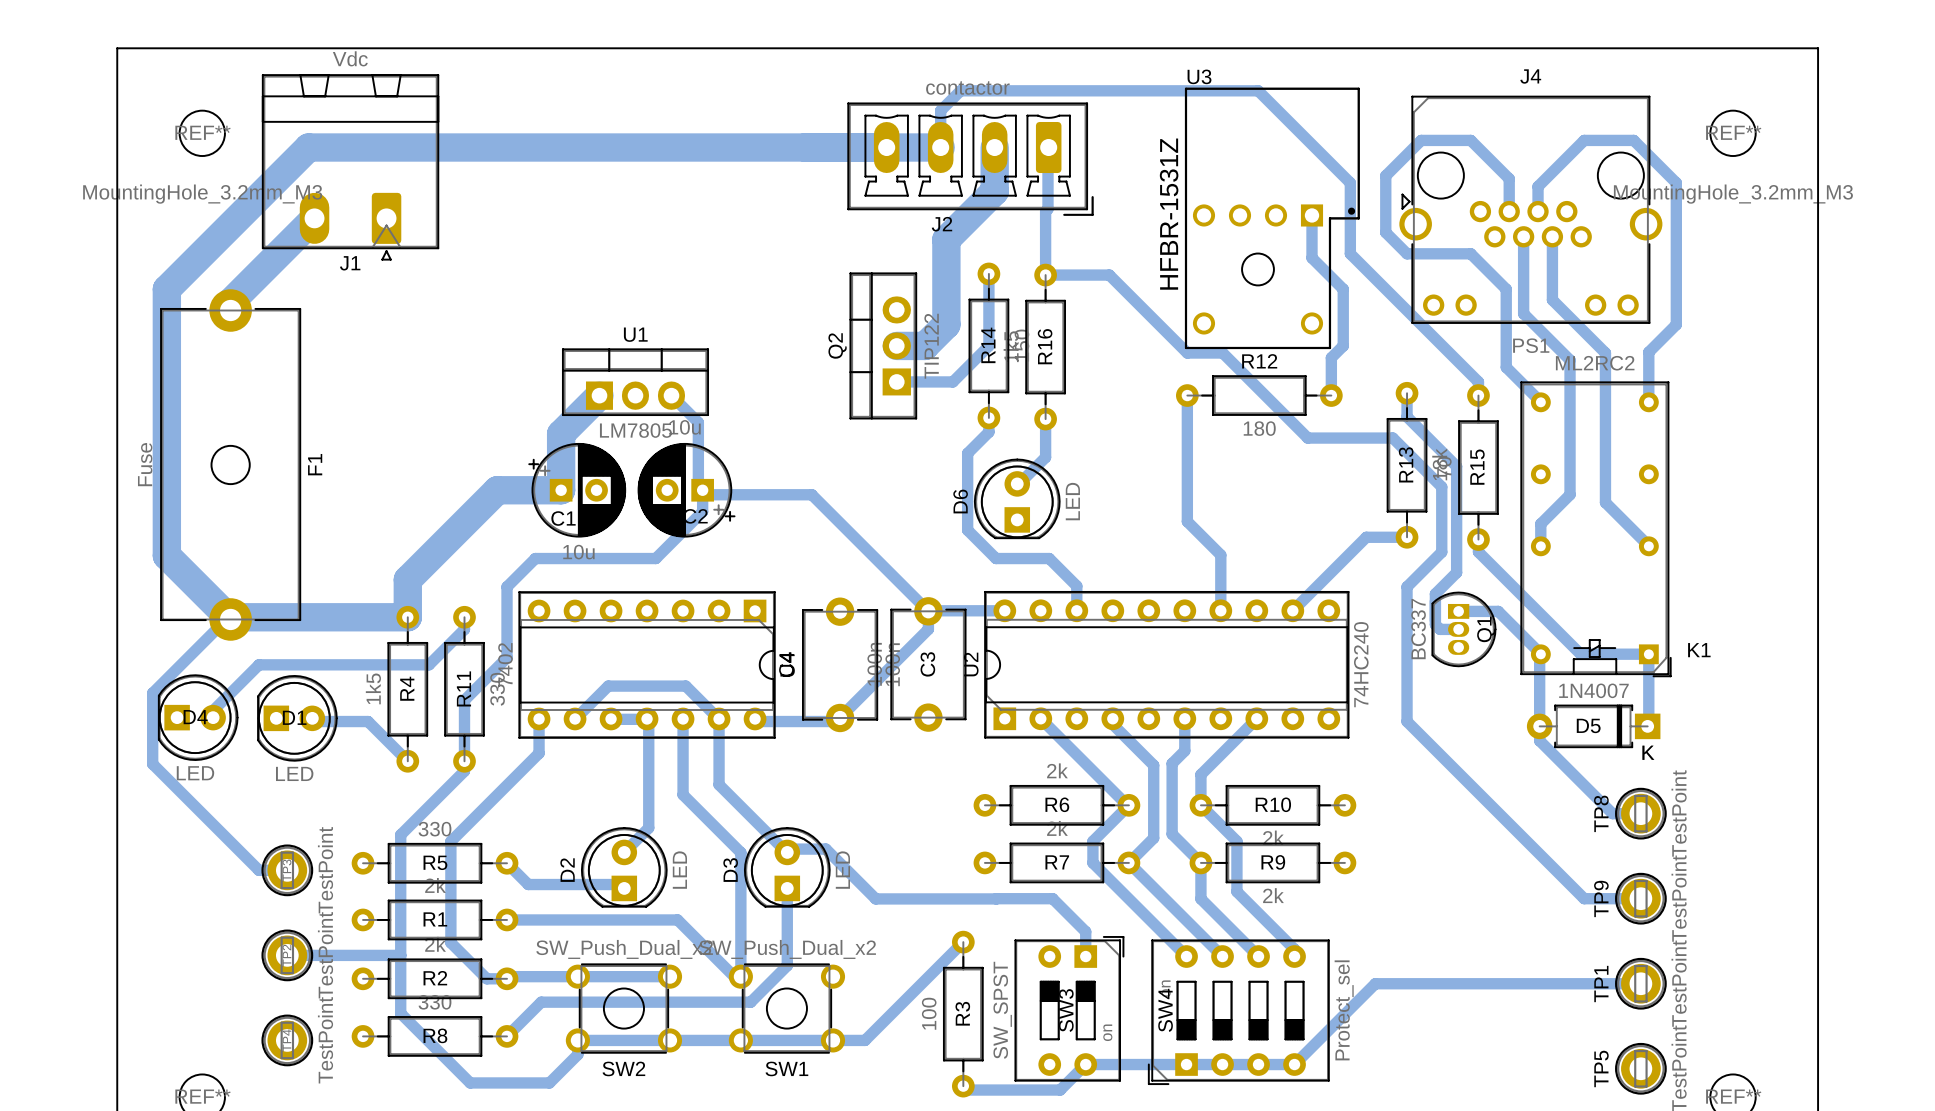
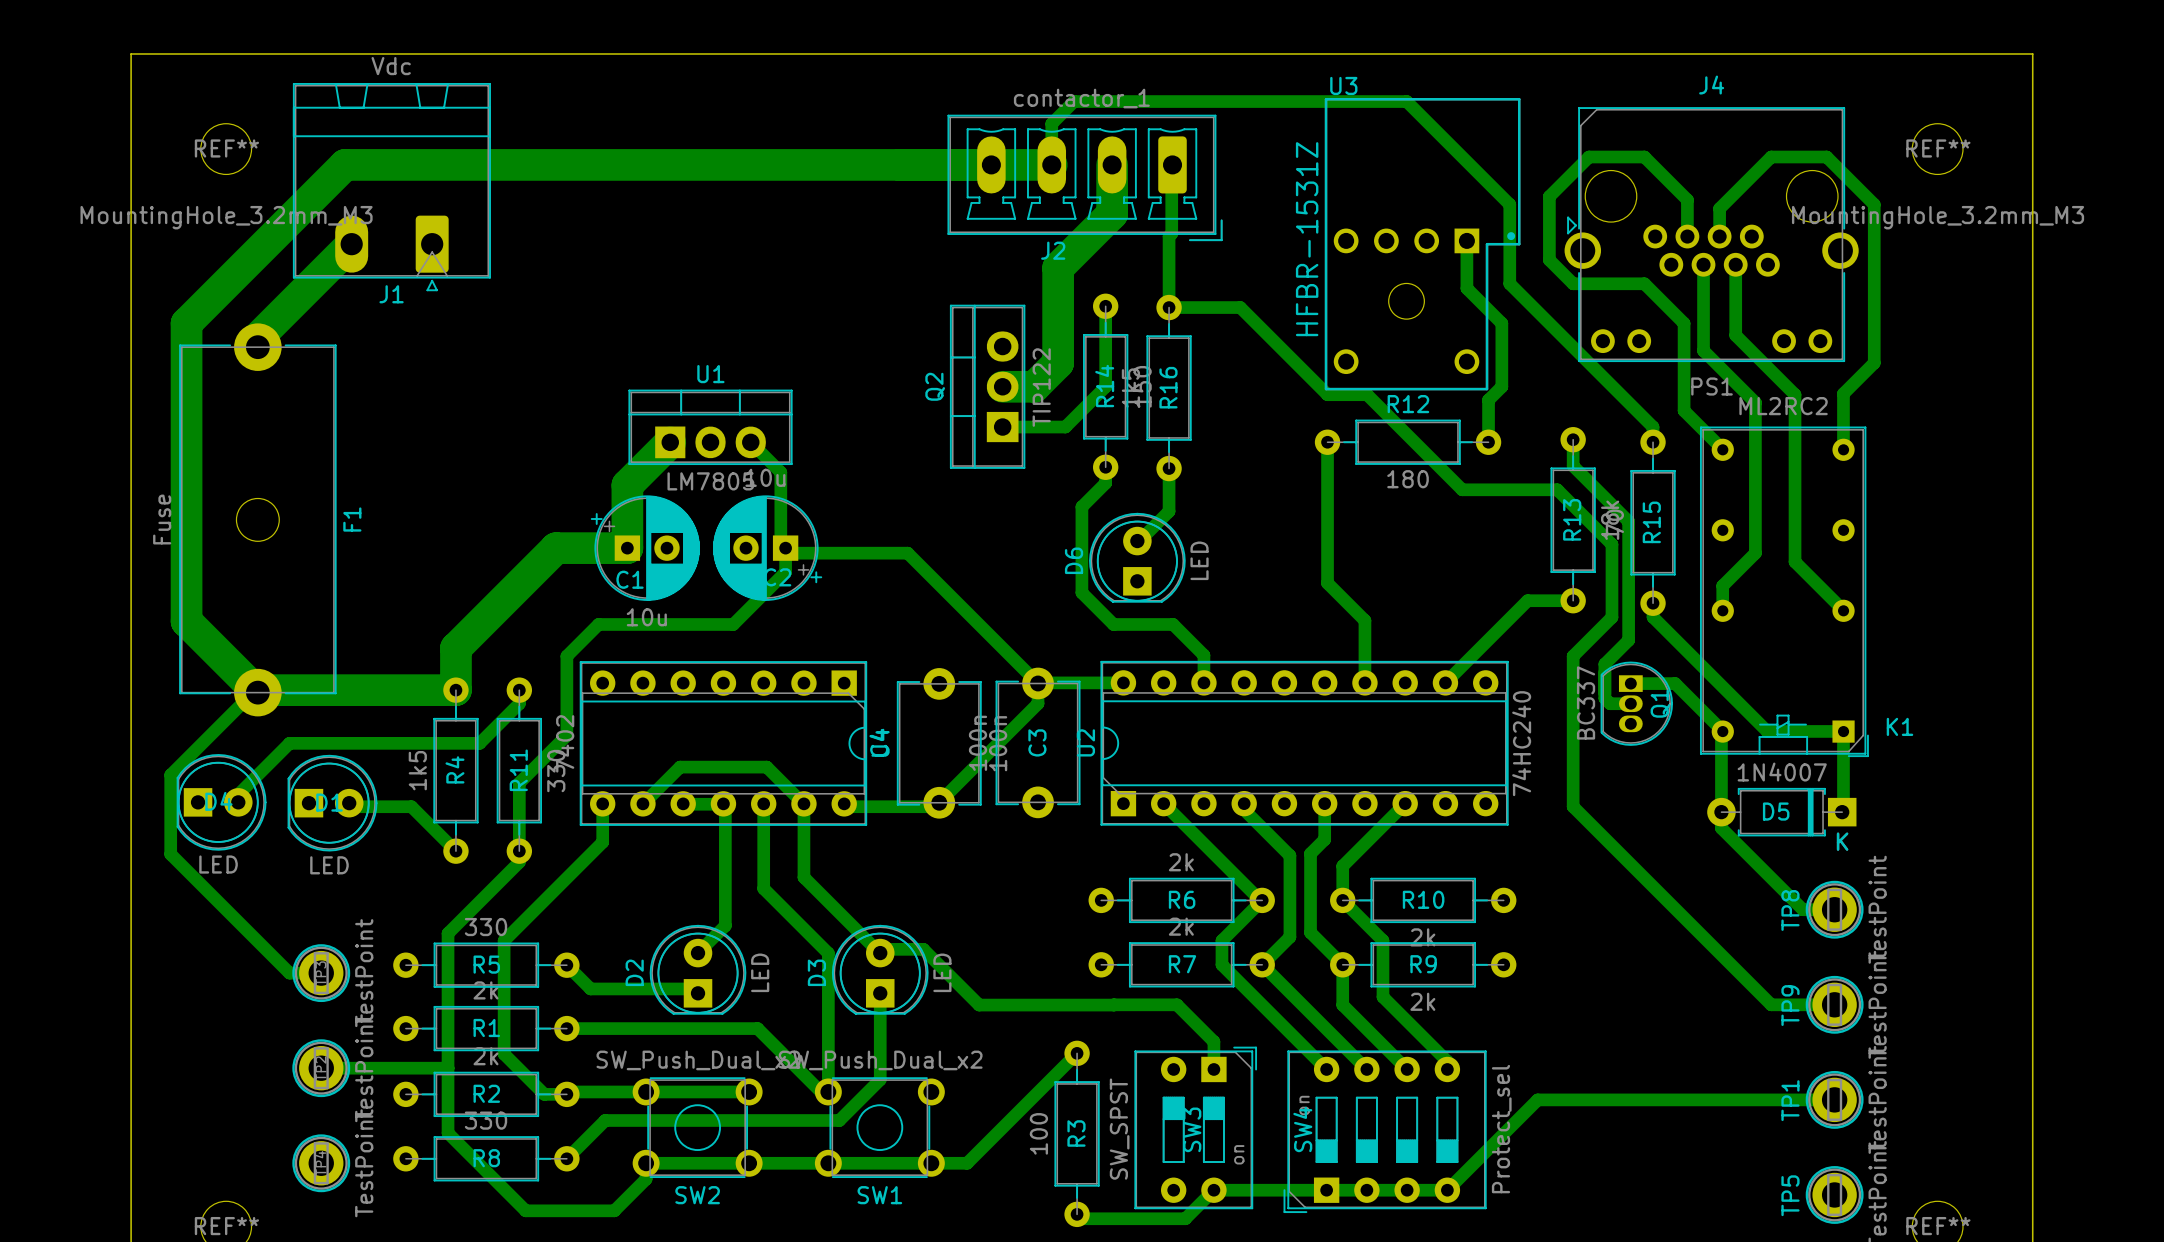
J2 value: contactor (967, 87) -> contactor_1 (1081, 98)

